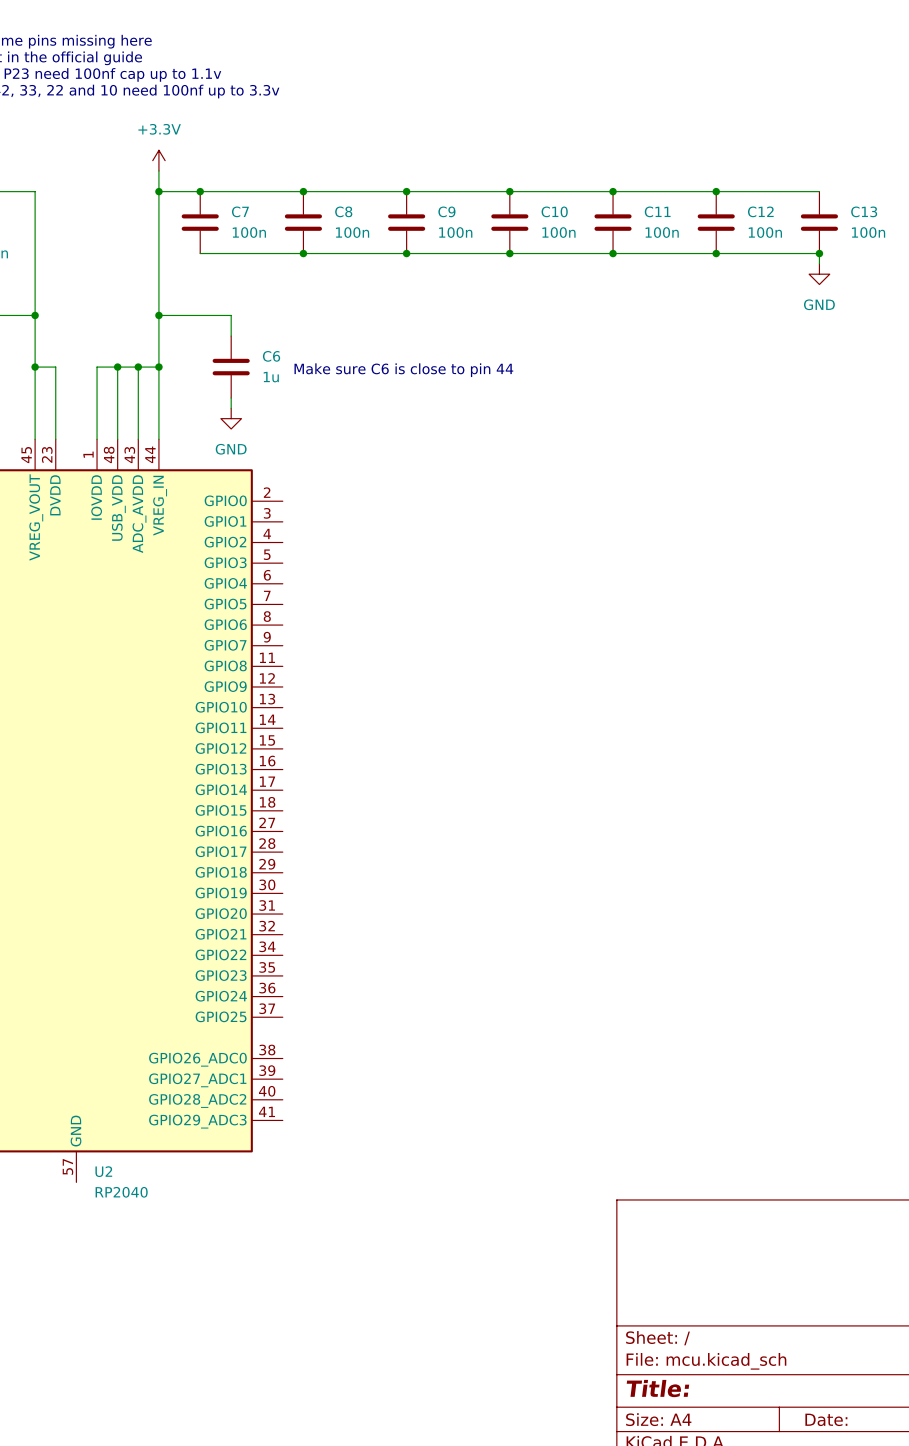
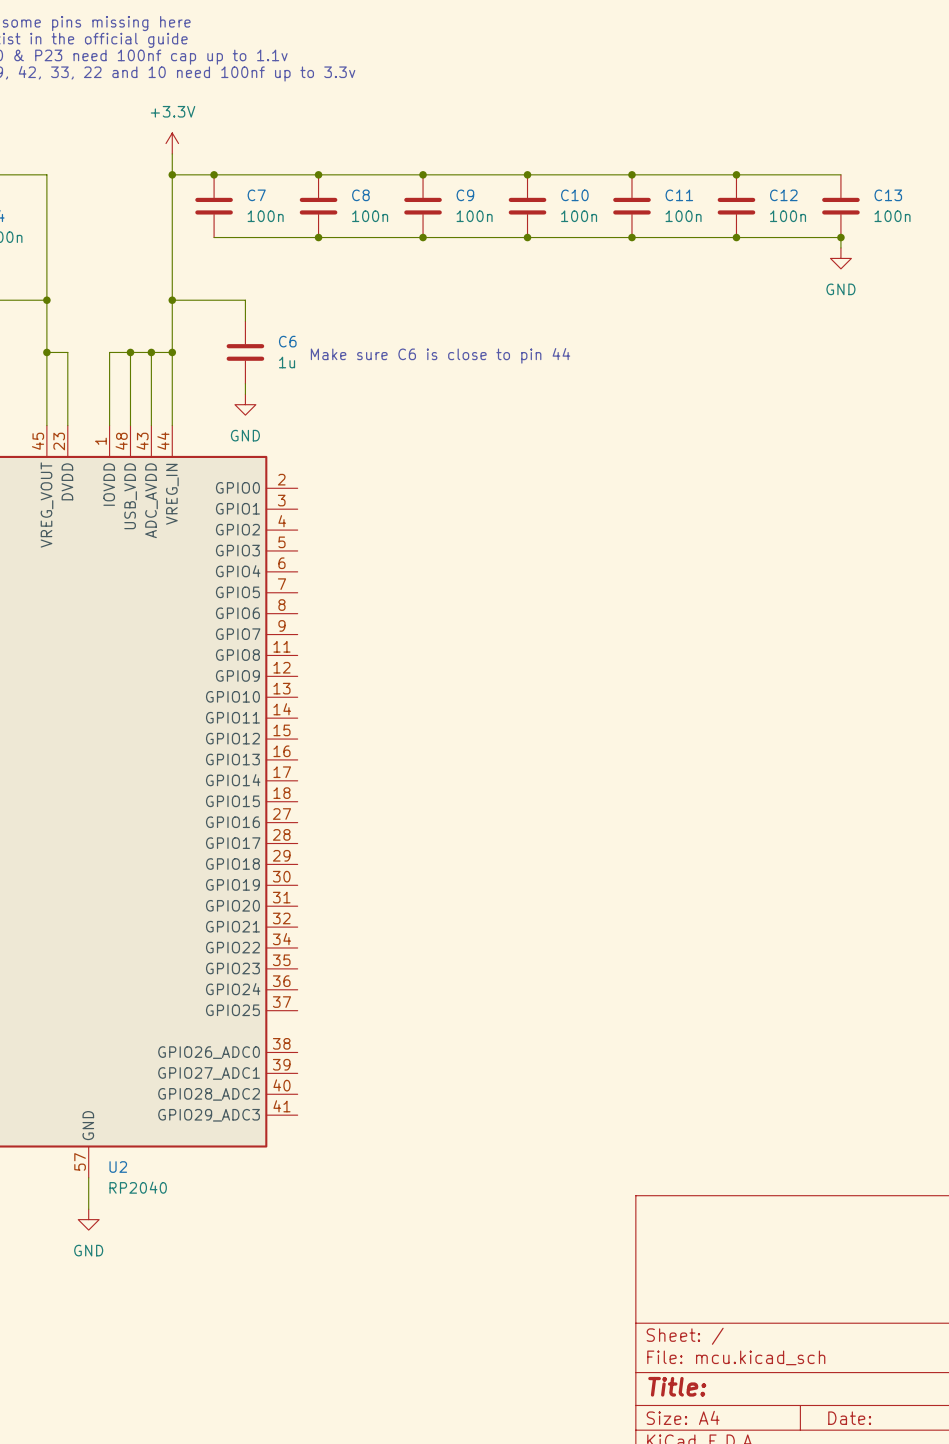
wire: none -> (88, 1177) (88, 1209)
power symbol: none -> GND (88, 1219)

